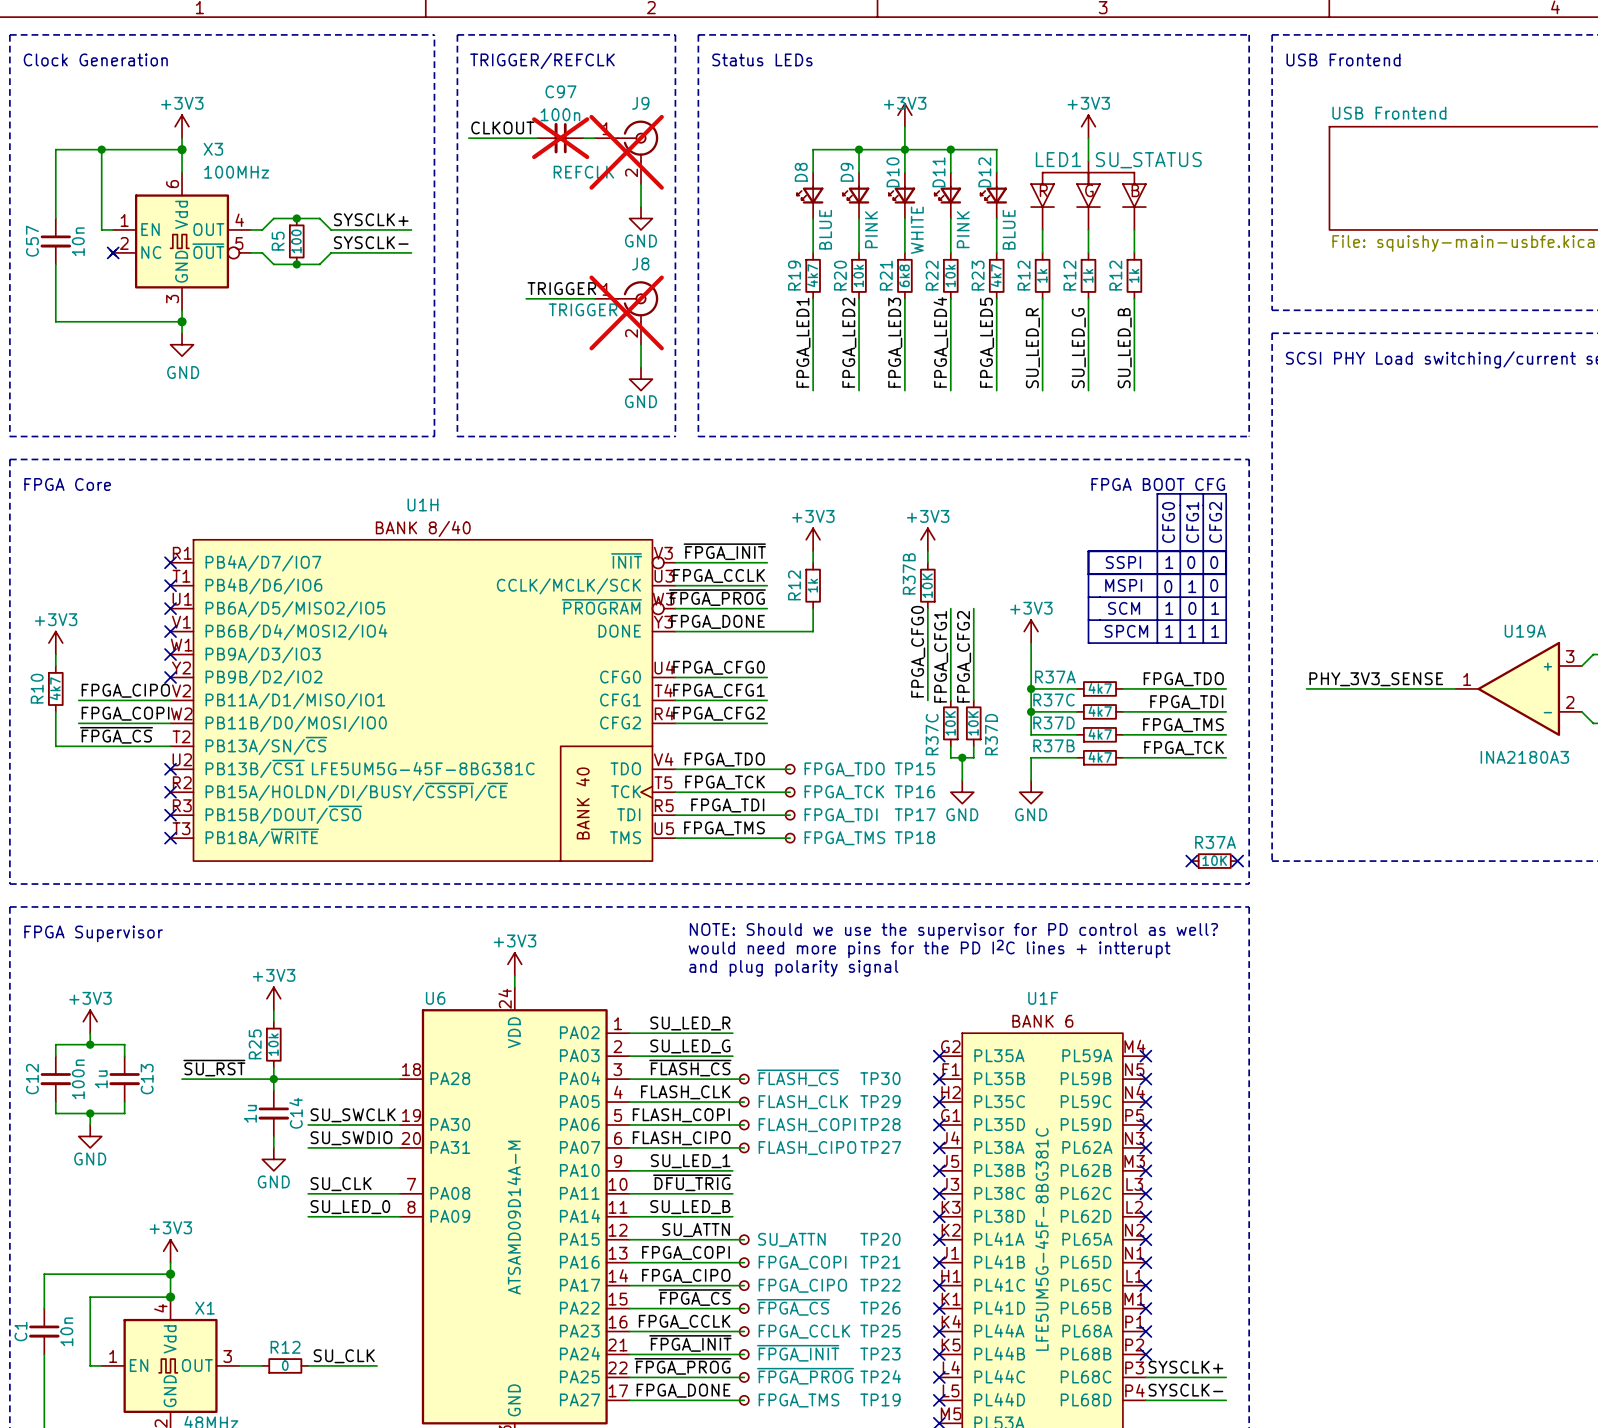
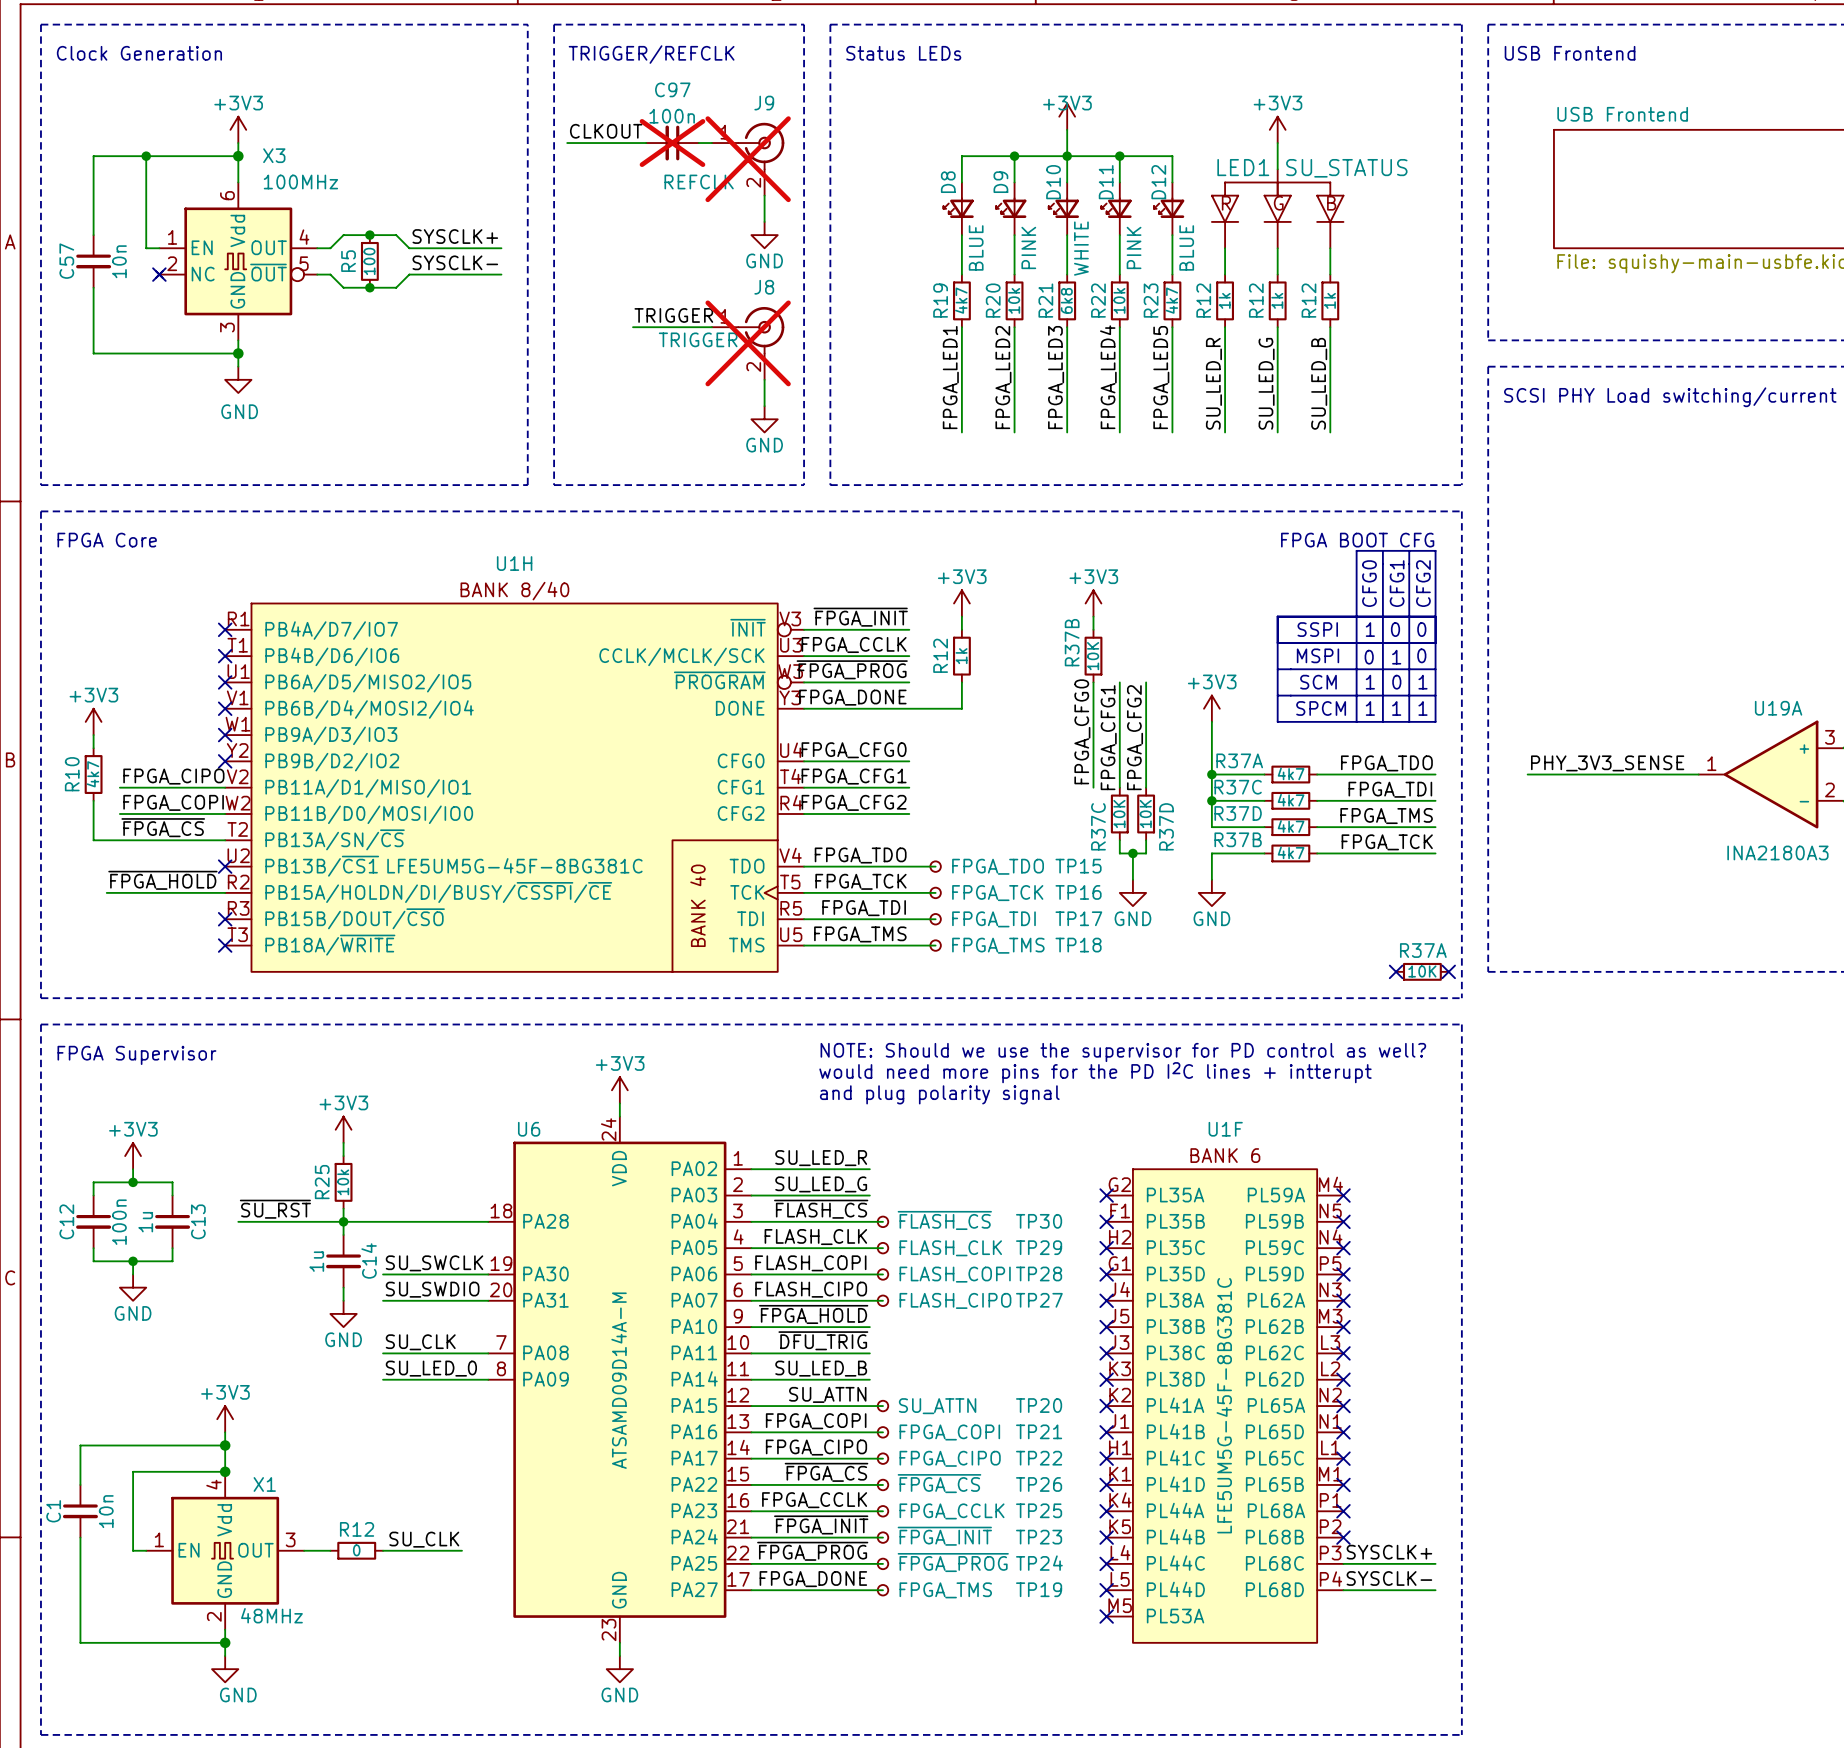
label: none -> ~{FPGA_HOLD} (162, 880)
wire: none -> (106, 892) (225, 892)
no-connect mark: (170, 792) -> none
label: SU_LED_1 (690, 1161) -> ~{FPGA_HOLD} (813, 1314)

